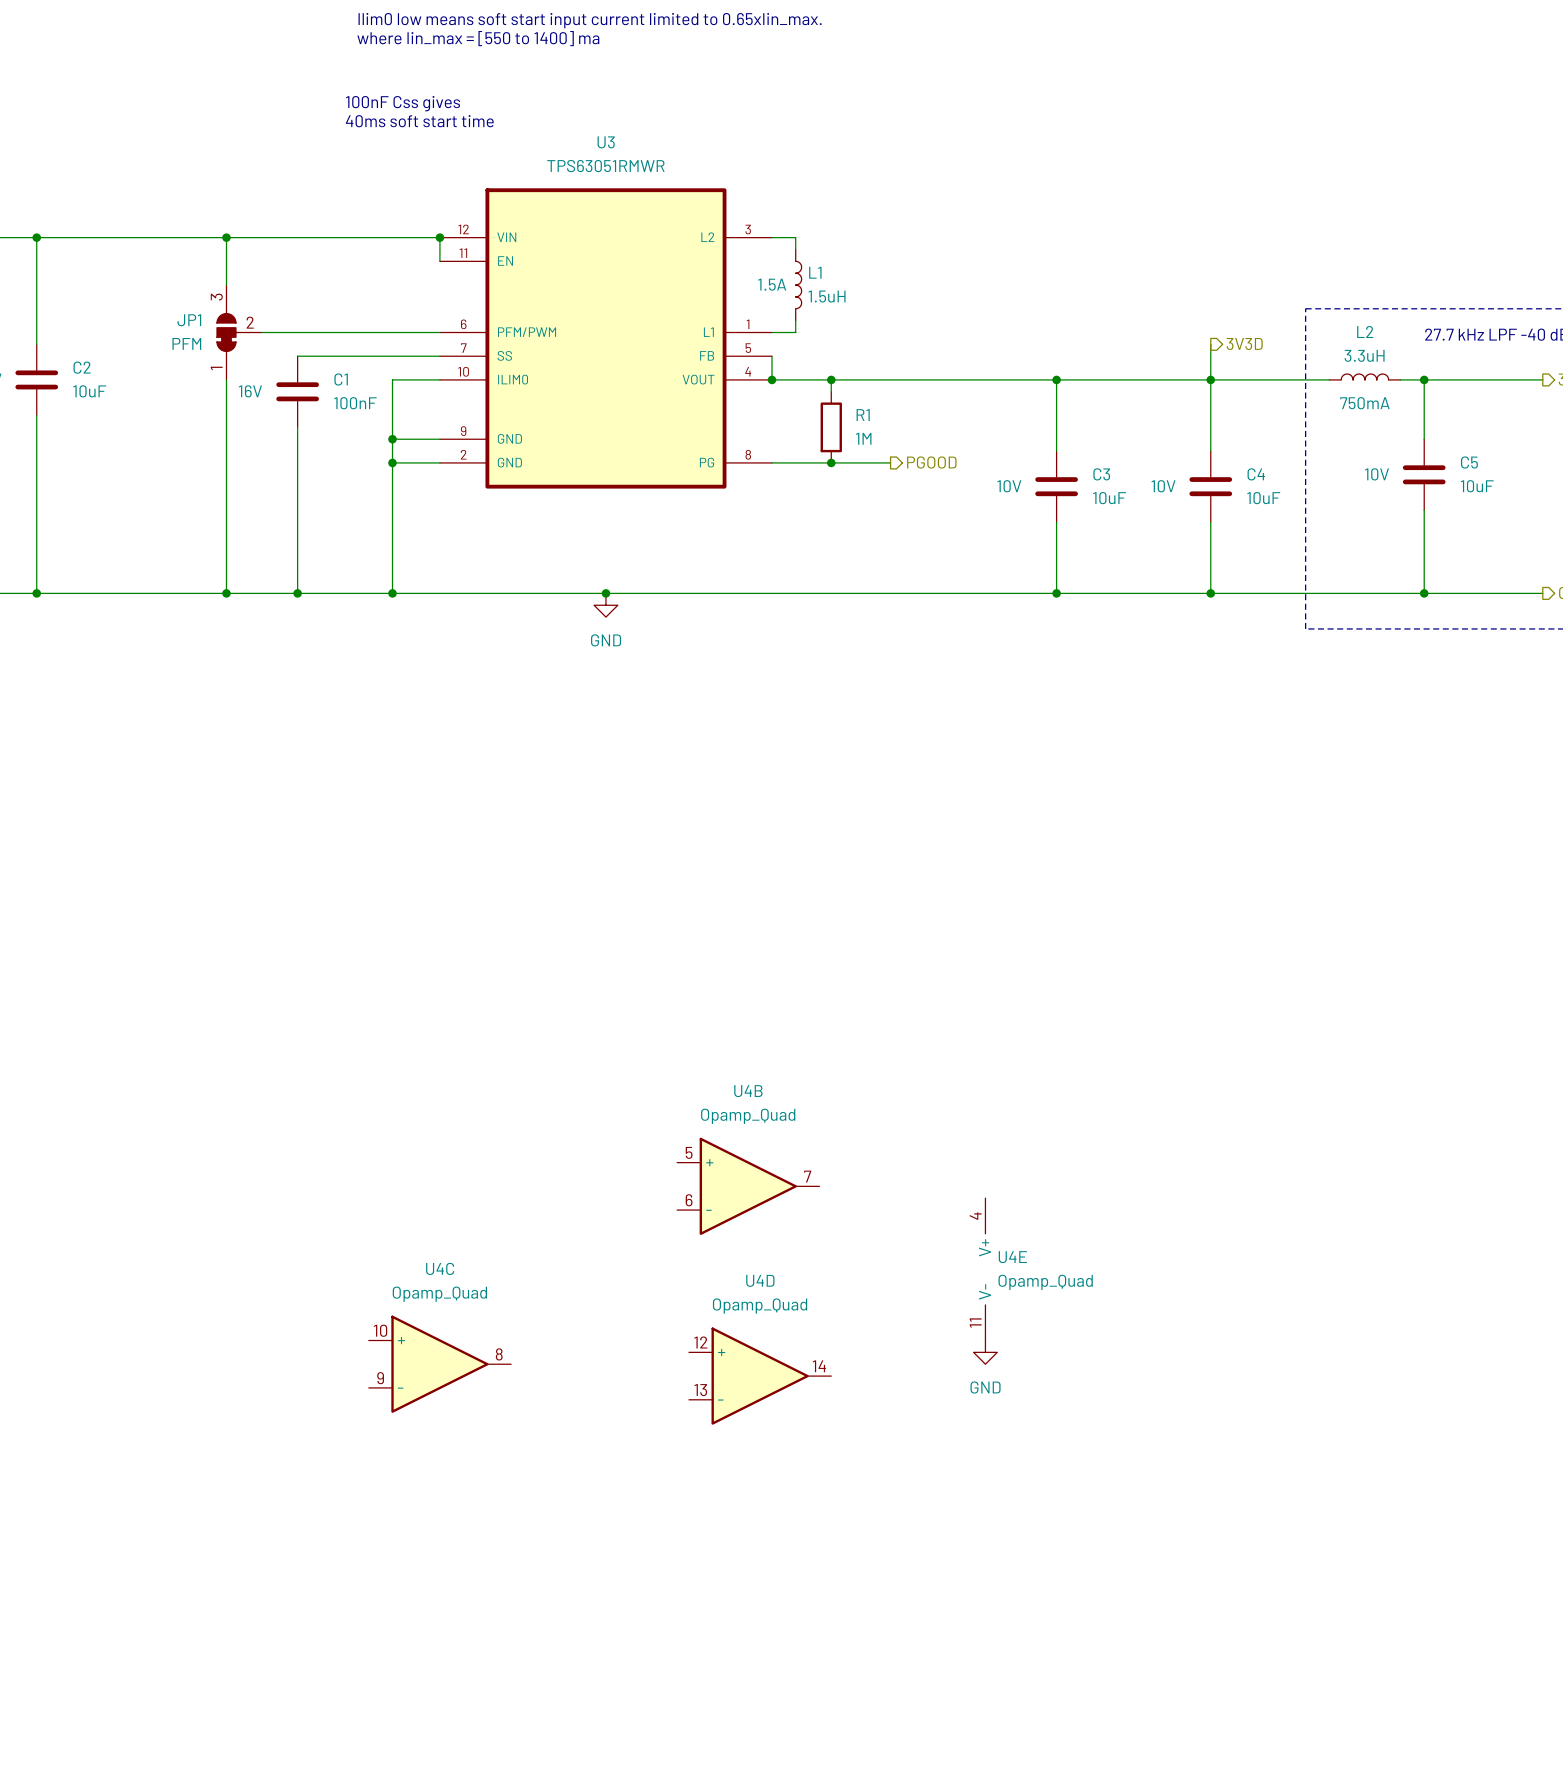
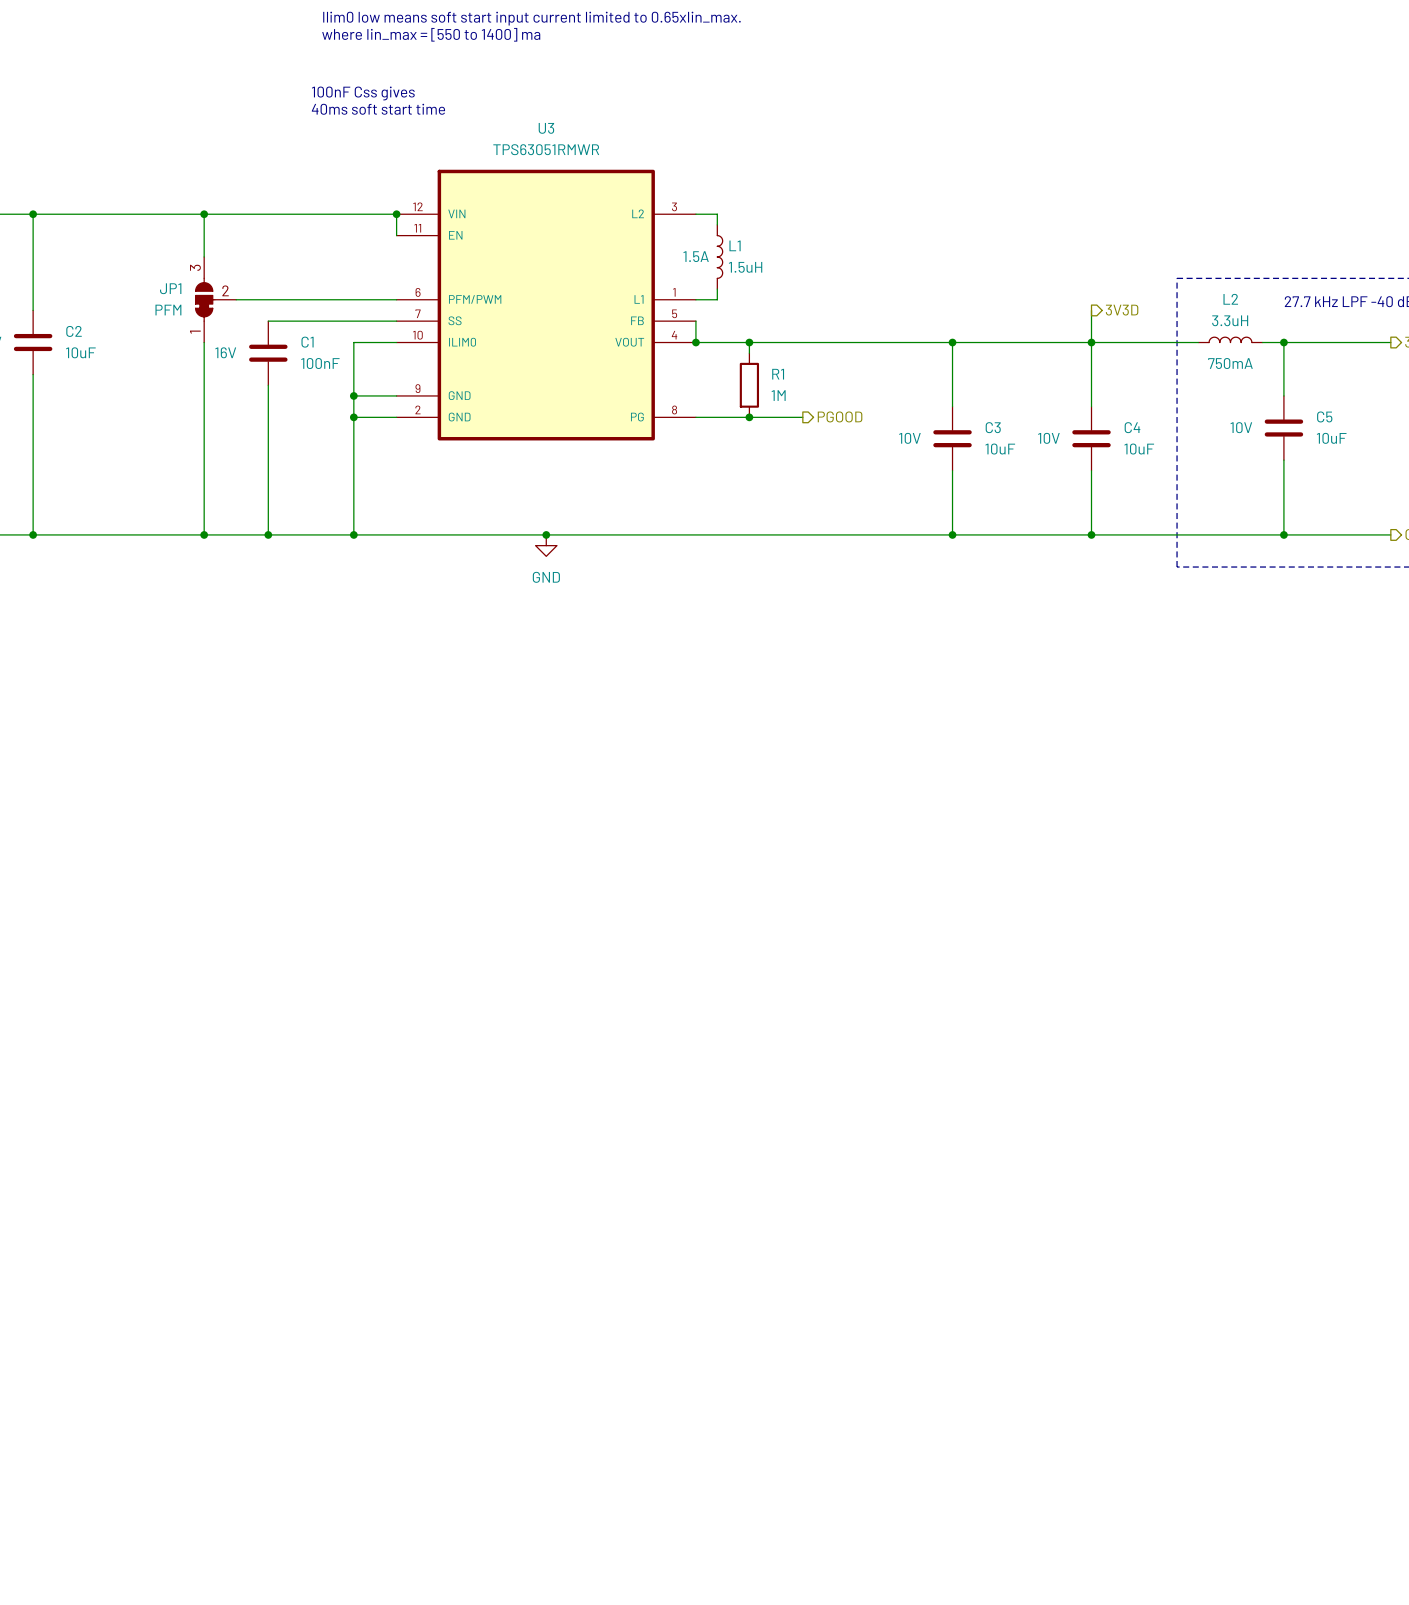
U4B: Opamp_Quad (748, 1186) -> none
U4E: Opamp_Quad (985, 1269) -> none
power symbol: GND (985, 1352) -> none
U4C: Opamp_Quad (439, 1364) -> none
U4D: Opamp_Quad (760, 1376) -> none

